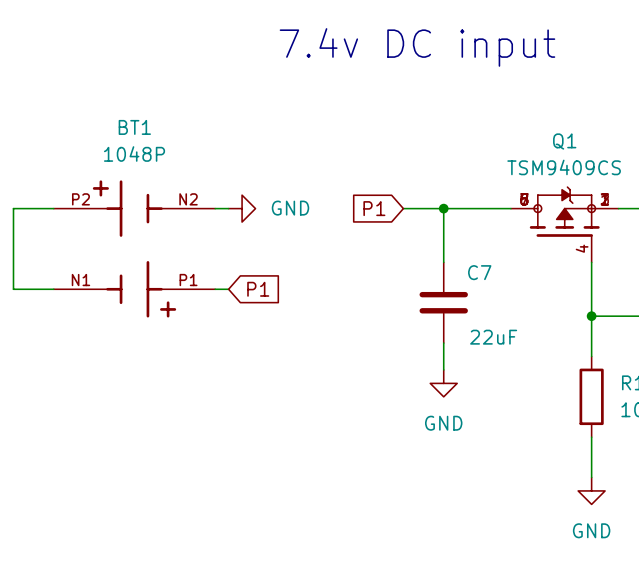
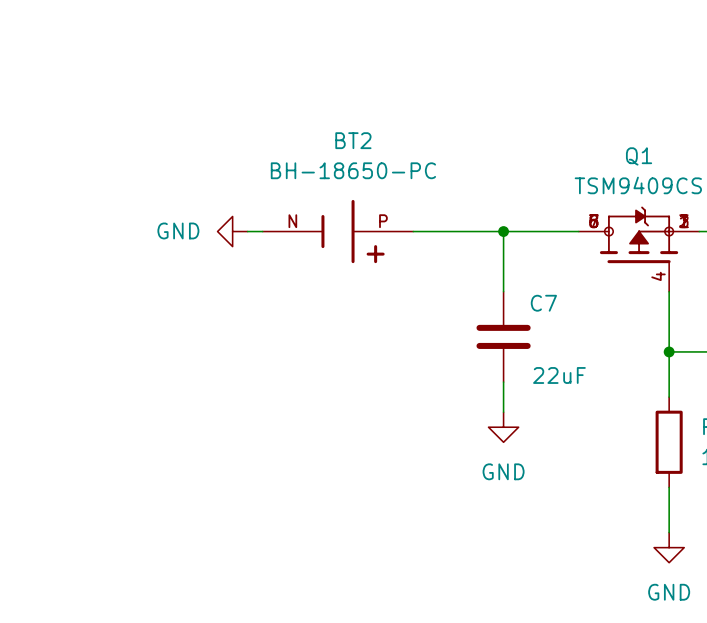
text: 7.4v DC input (417, 47) -> none
wire: (53, 208) (13, 208) (13, 289) (53, 289) -> none
power symbol rotation: 0° (242, 208) -> 180° (232, 231)
power symbol position: GND (242, 208) -> GND (232, 231)
BT2: none -> BH-18650-PC (337, 231)
wire: none -> (413, 231) (458, 231)
global label: P1 (374, 208) -> none
BT1: 1048P (134, 248) -> none
wire: (215, 289) (228, 289) -> none
global label: P1 (258, 289) -> none

